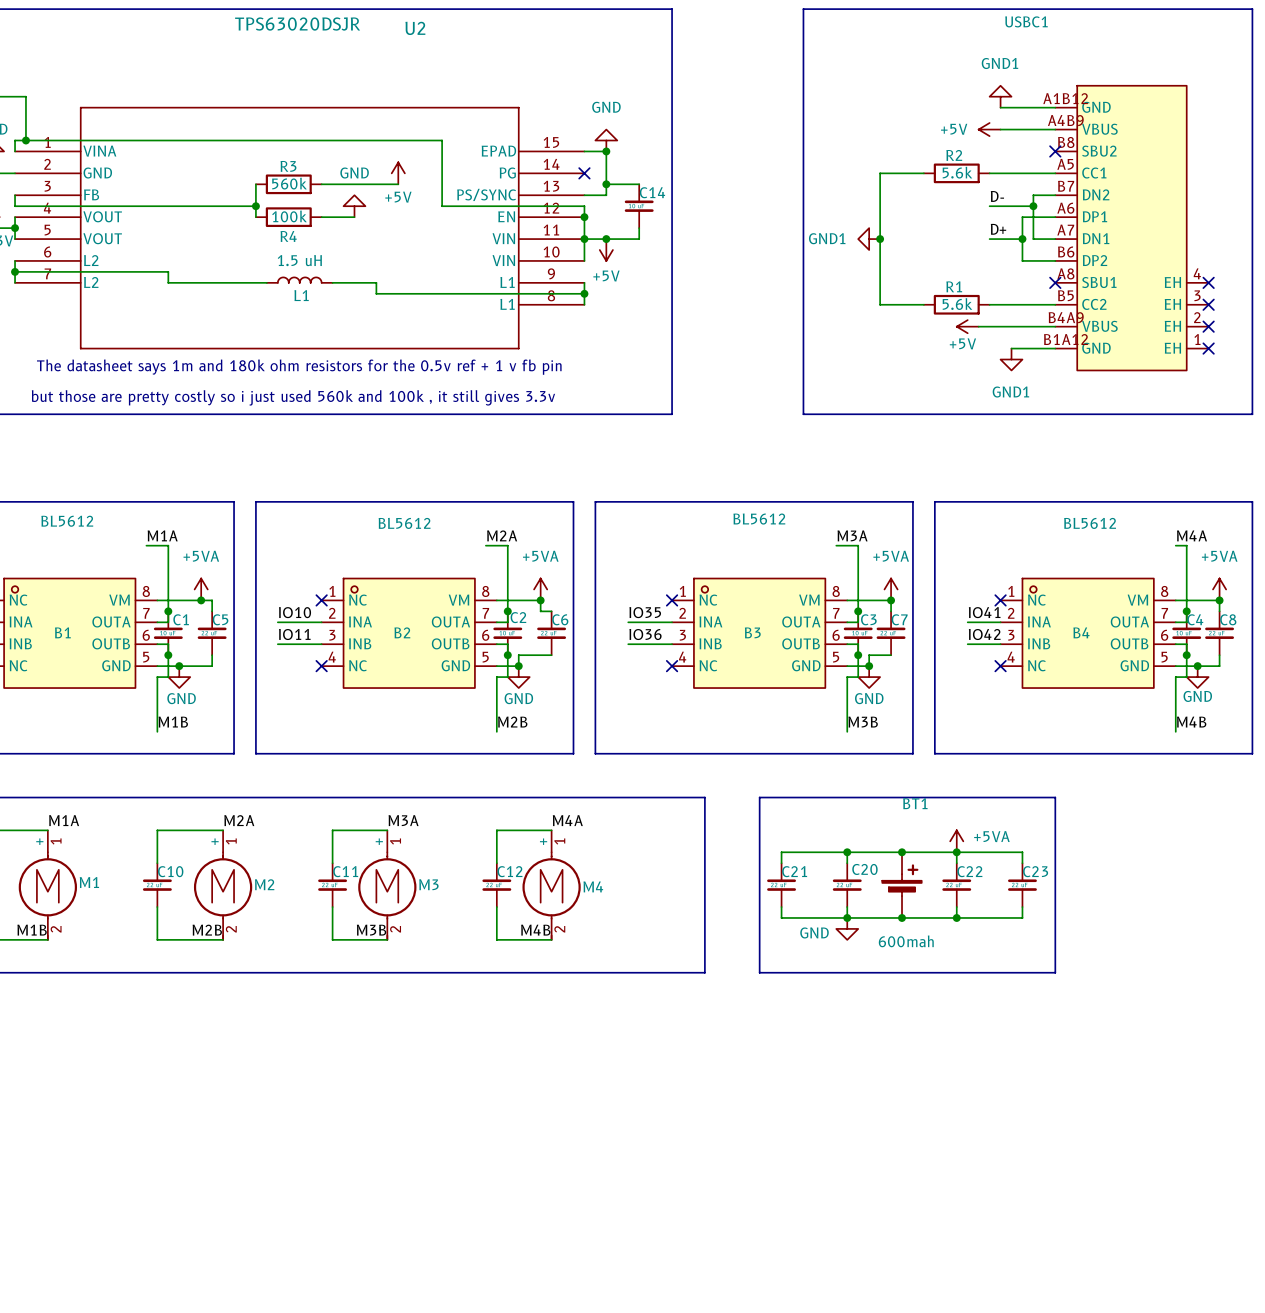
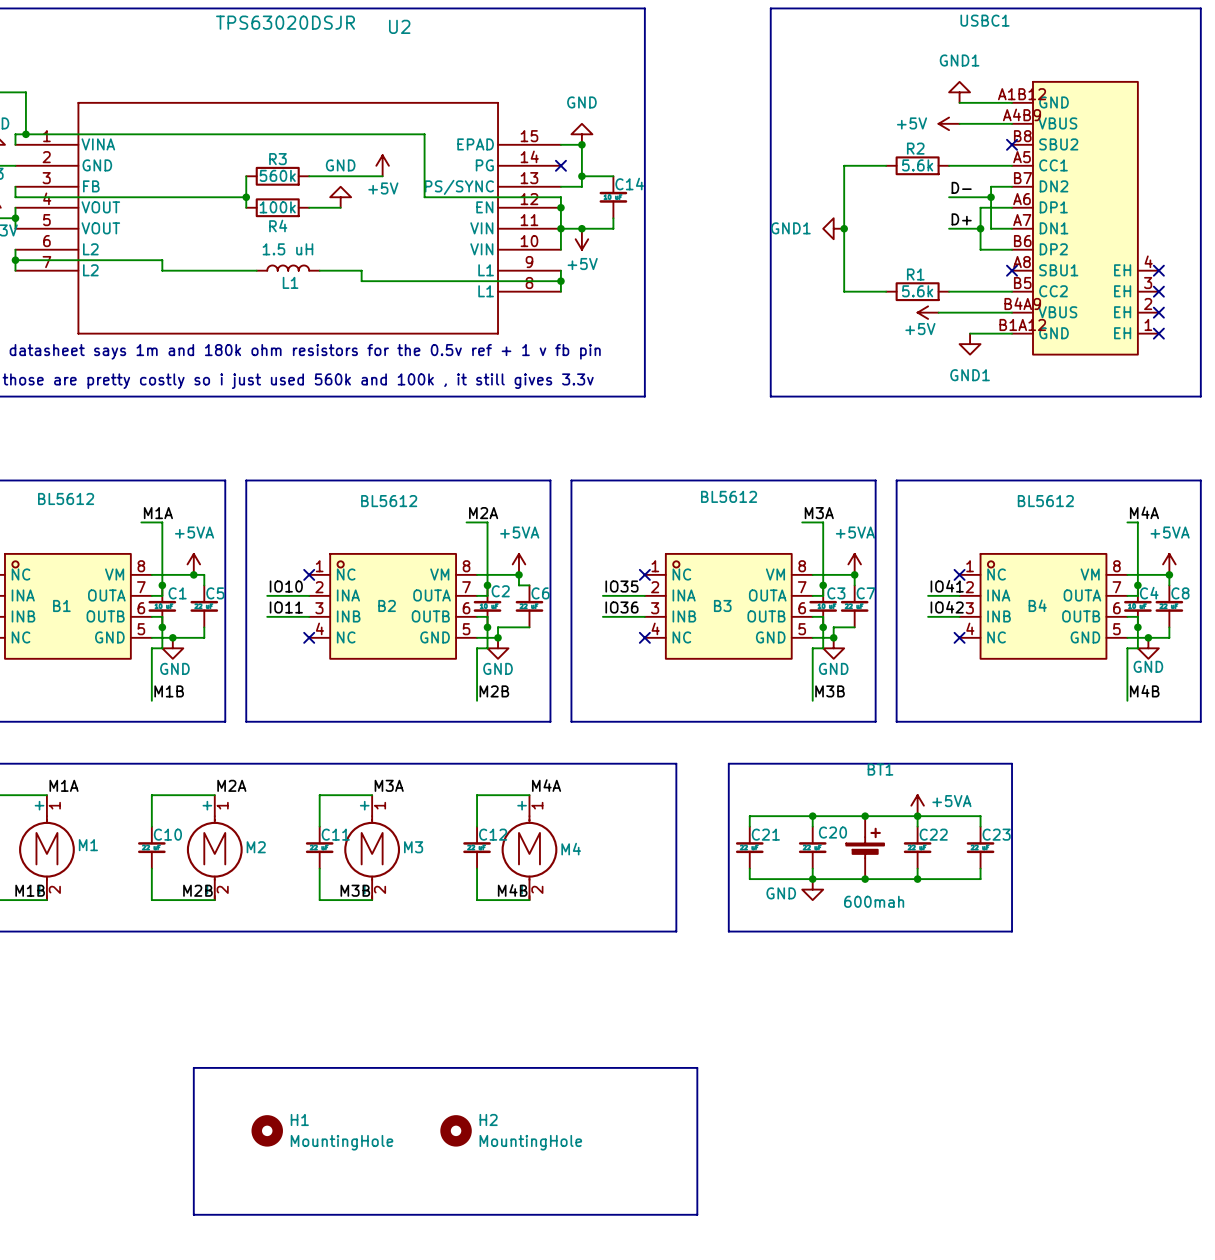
line: none -> (193, 1067) (697, 1067) (697, 1214) (193, 1214) (193, 1067)
H1: none -> MountingHole (267, 1130)
H2: none -> MountingHole (456, 1130)

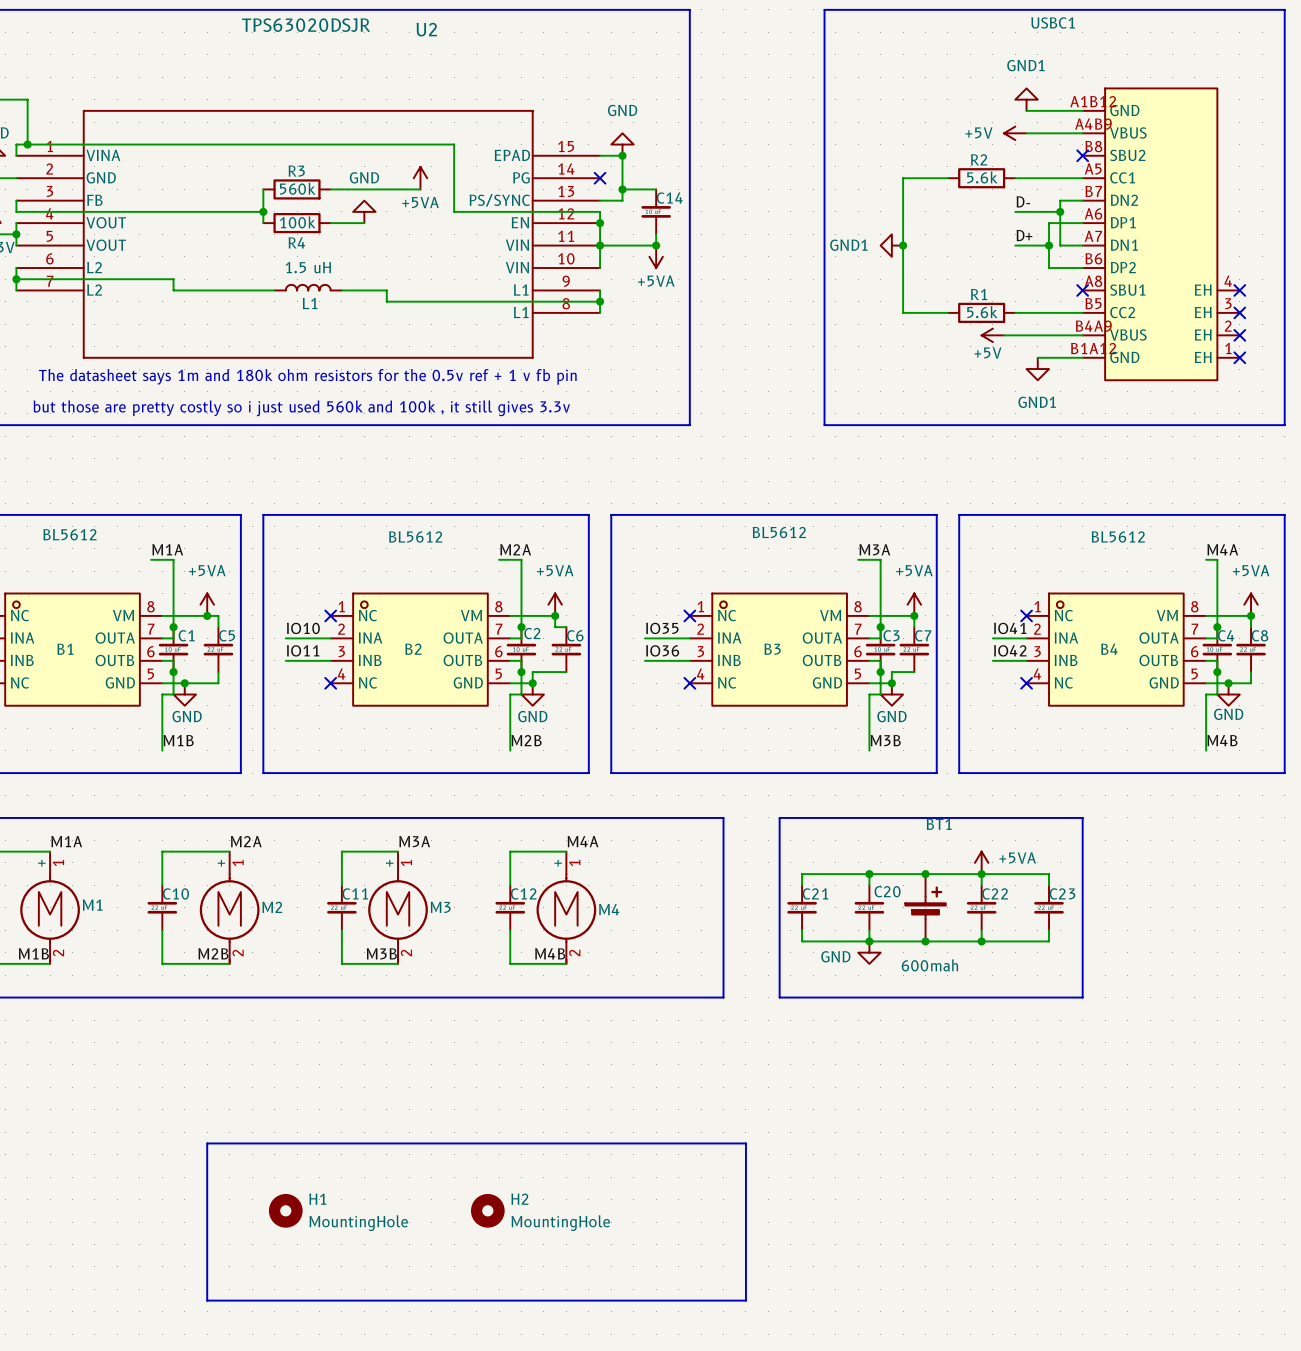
power symbol: +5V (382, 165) -> none
power symbol: none -> +5VA (420, 178)
wire: none -> (409, 189) (420, 189)
junction position: (581, 228) -> (656, 245)
power symbol: +5V (581, 239) -> none
power symbol: none -> +5VA (656, 256)

